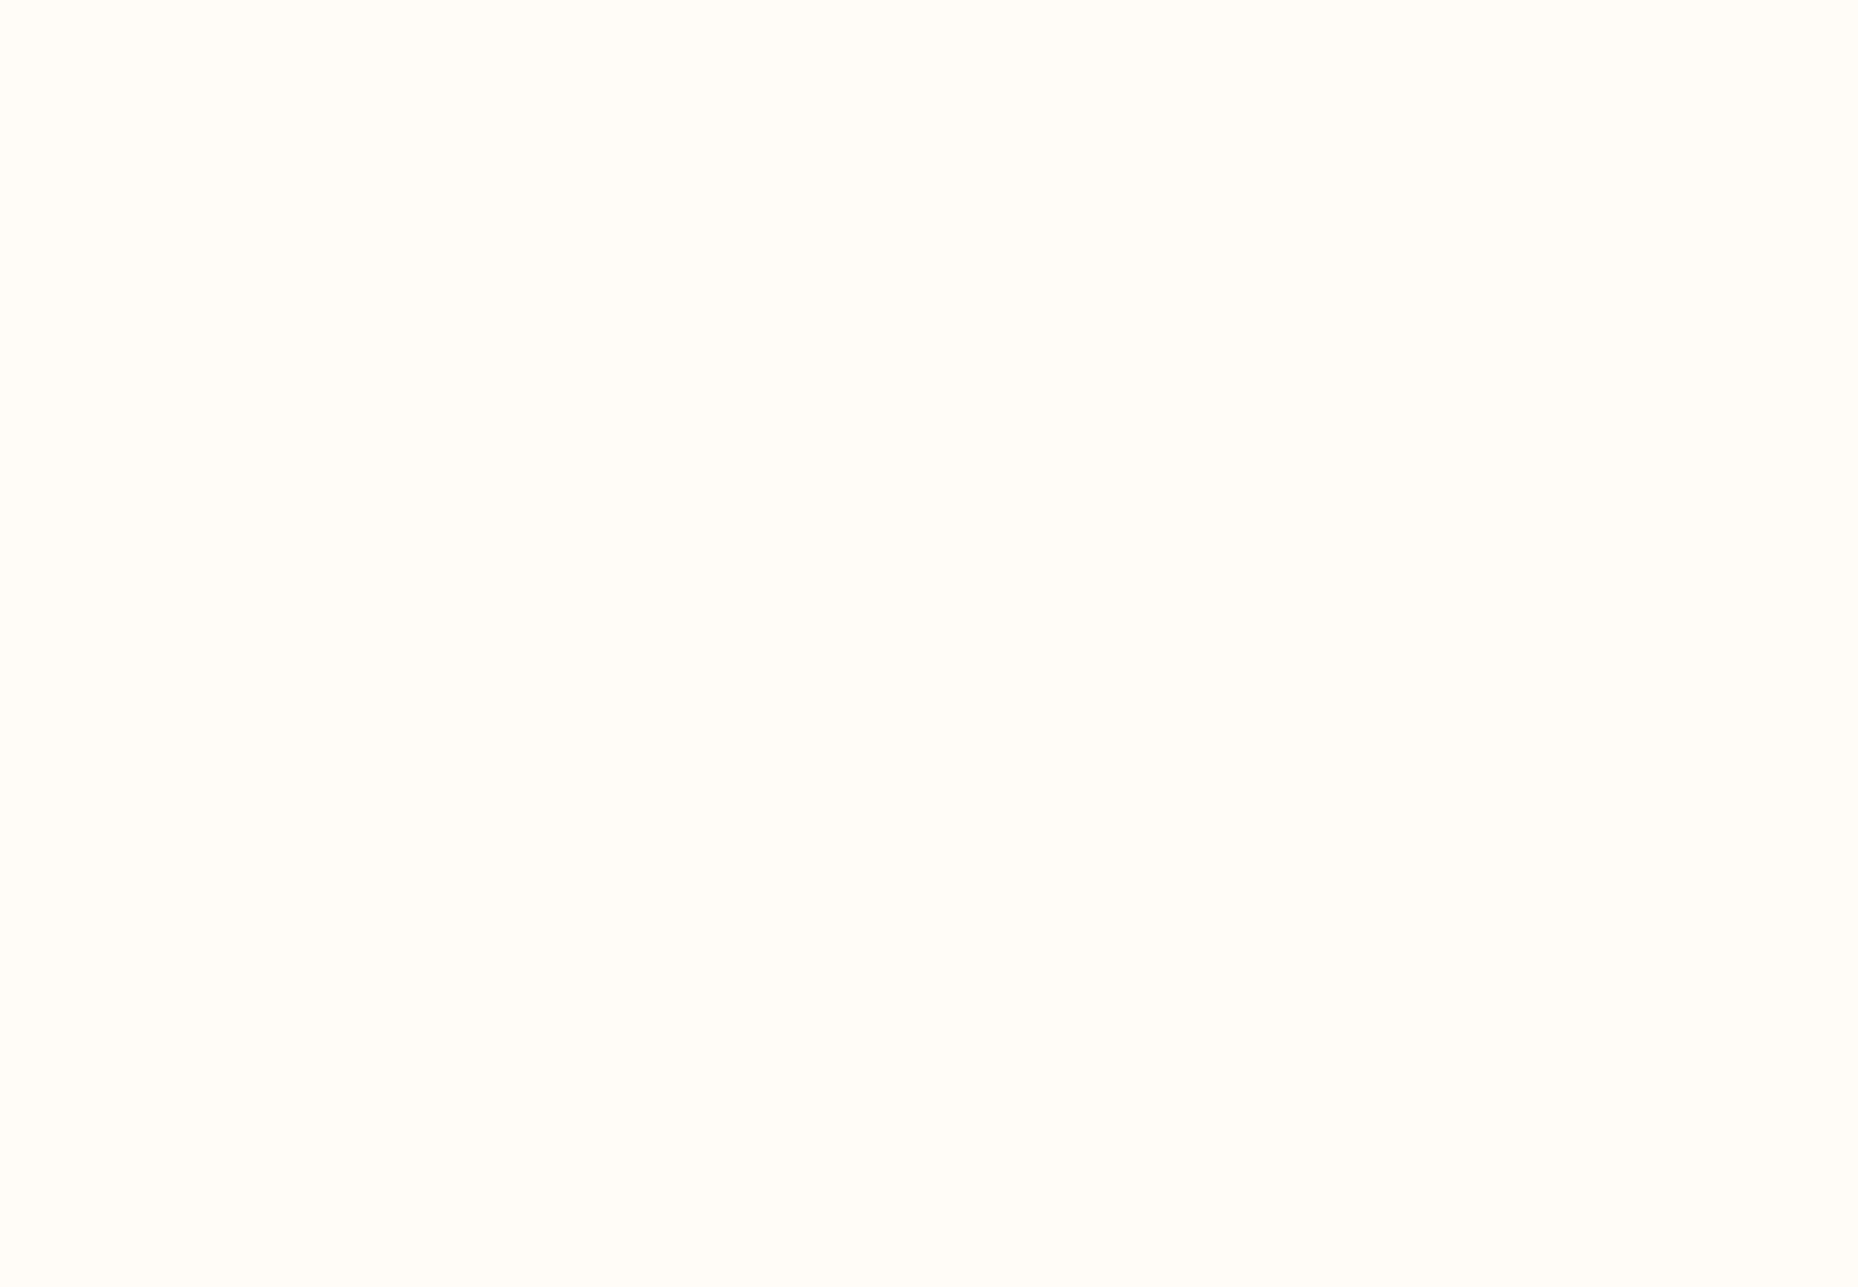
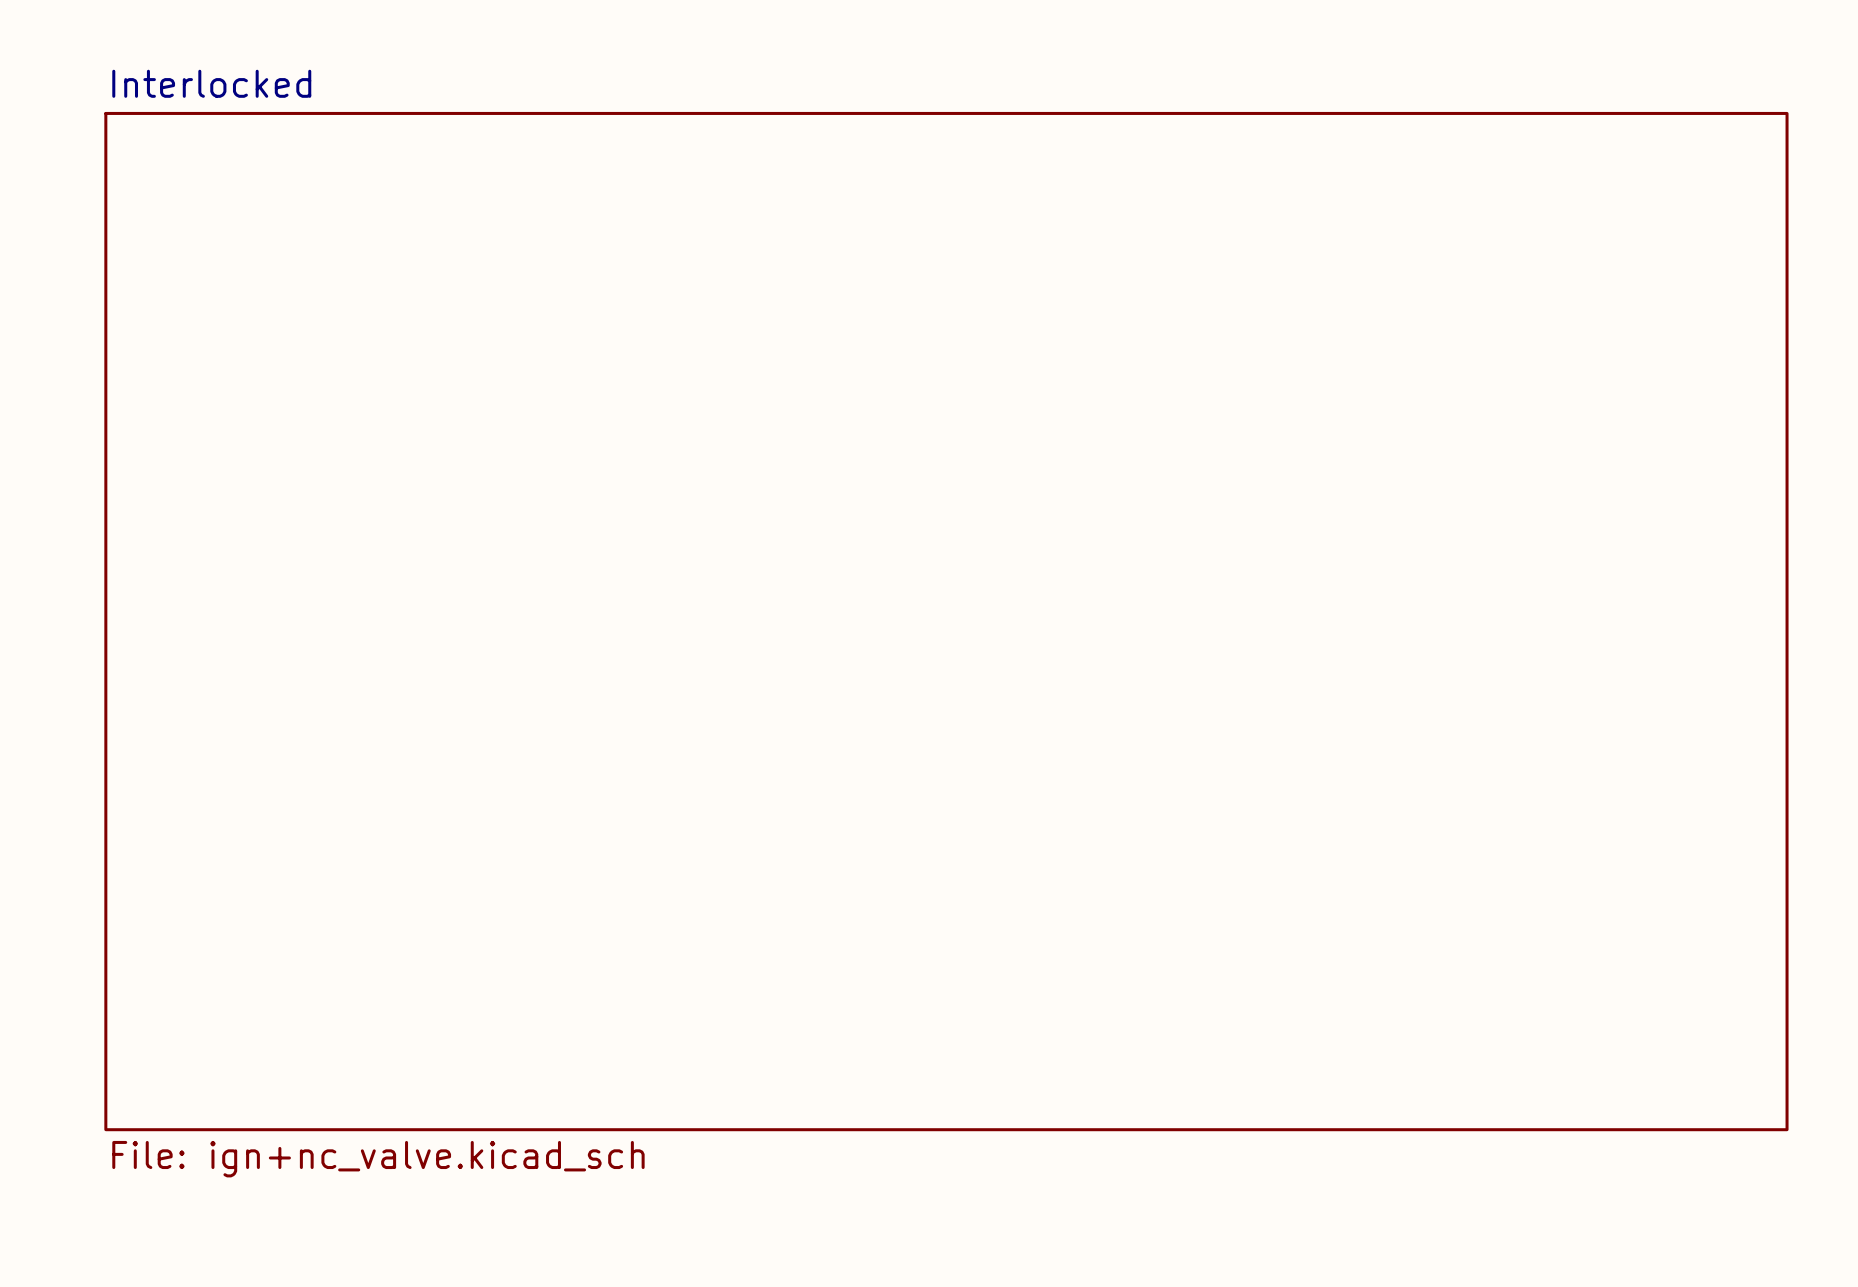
sheet Interlocked: none -> File: ign+nc_valve.kicad_sch (946, 621)

